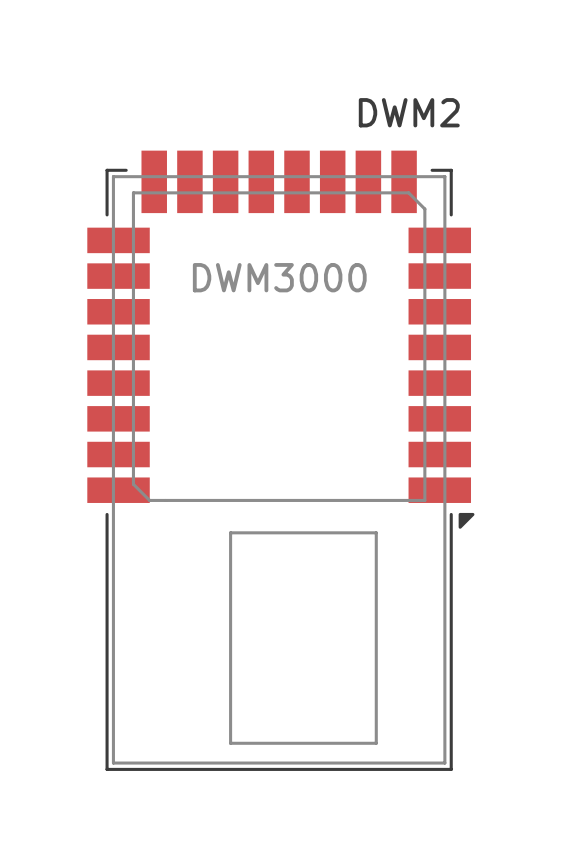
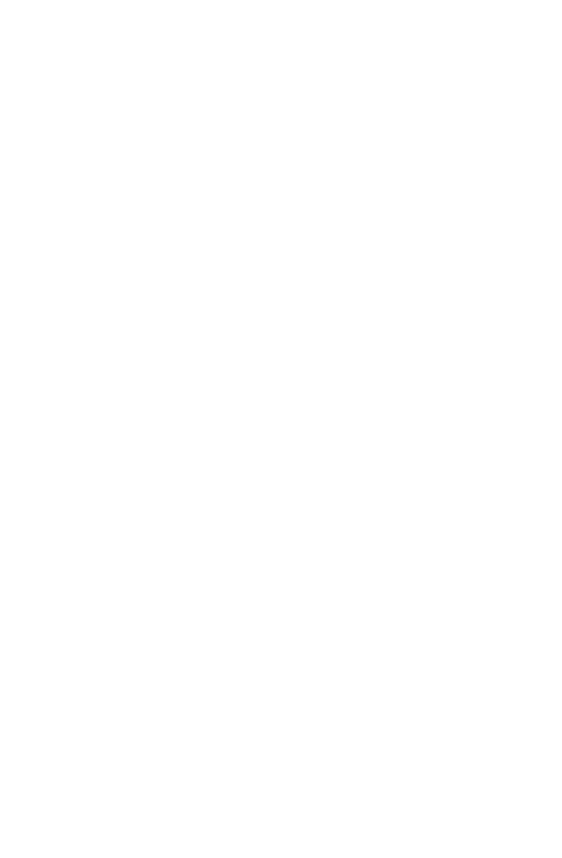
DWM2: DWM3000 (280, 460) -> none

